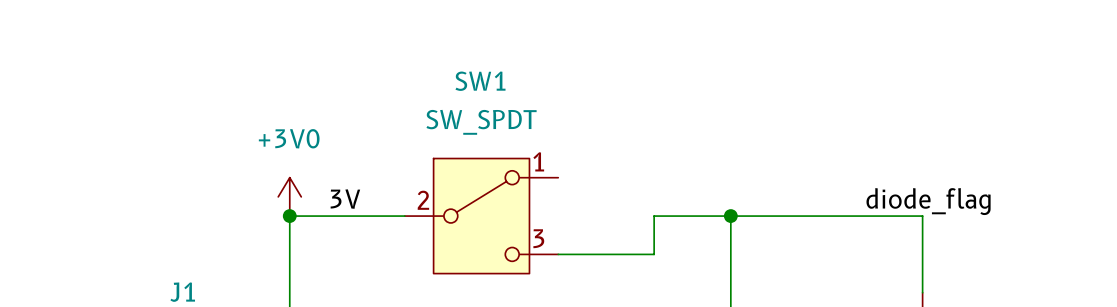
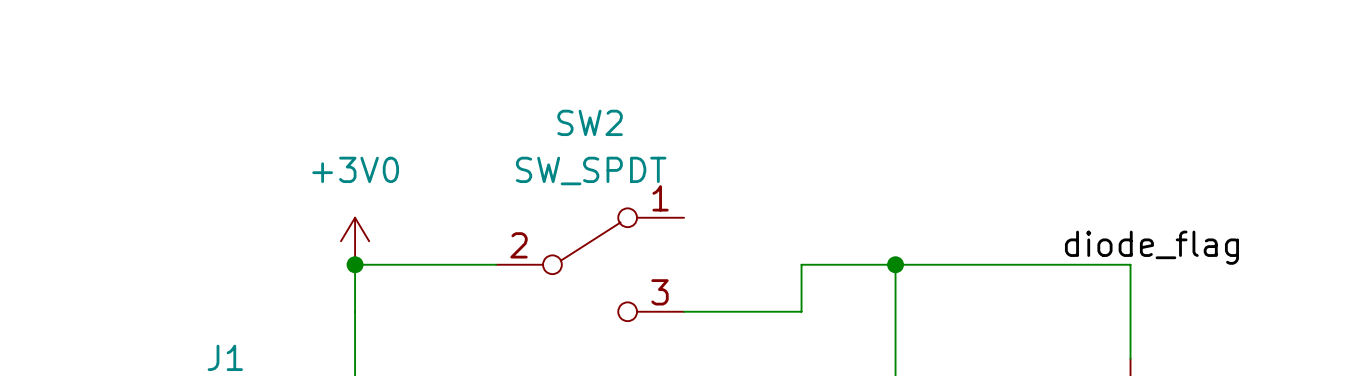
label: 3V (345, 199) -> none
SW1: SW_SPDT (481, 216) -> none
SW2: none -> SW_SPDT (590, 264)

